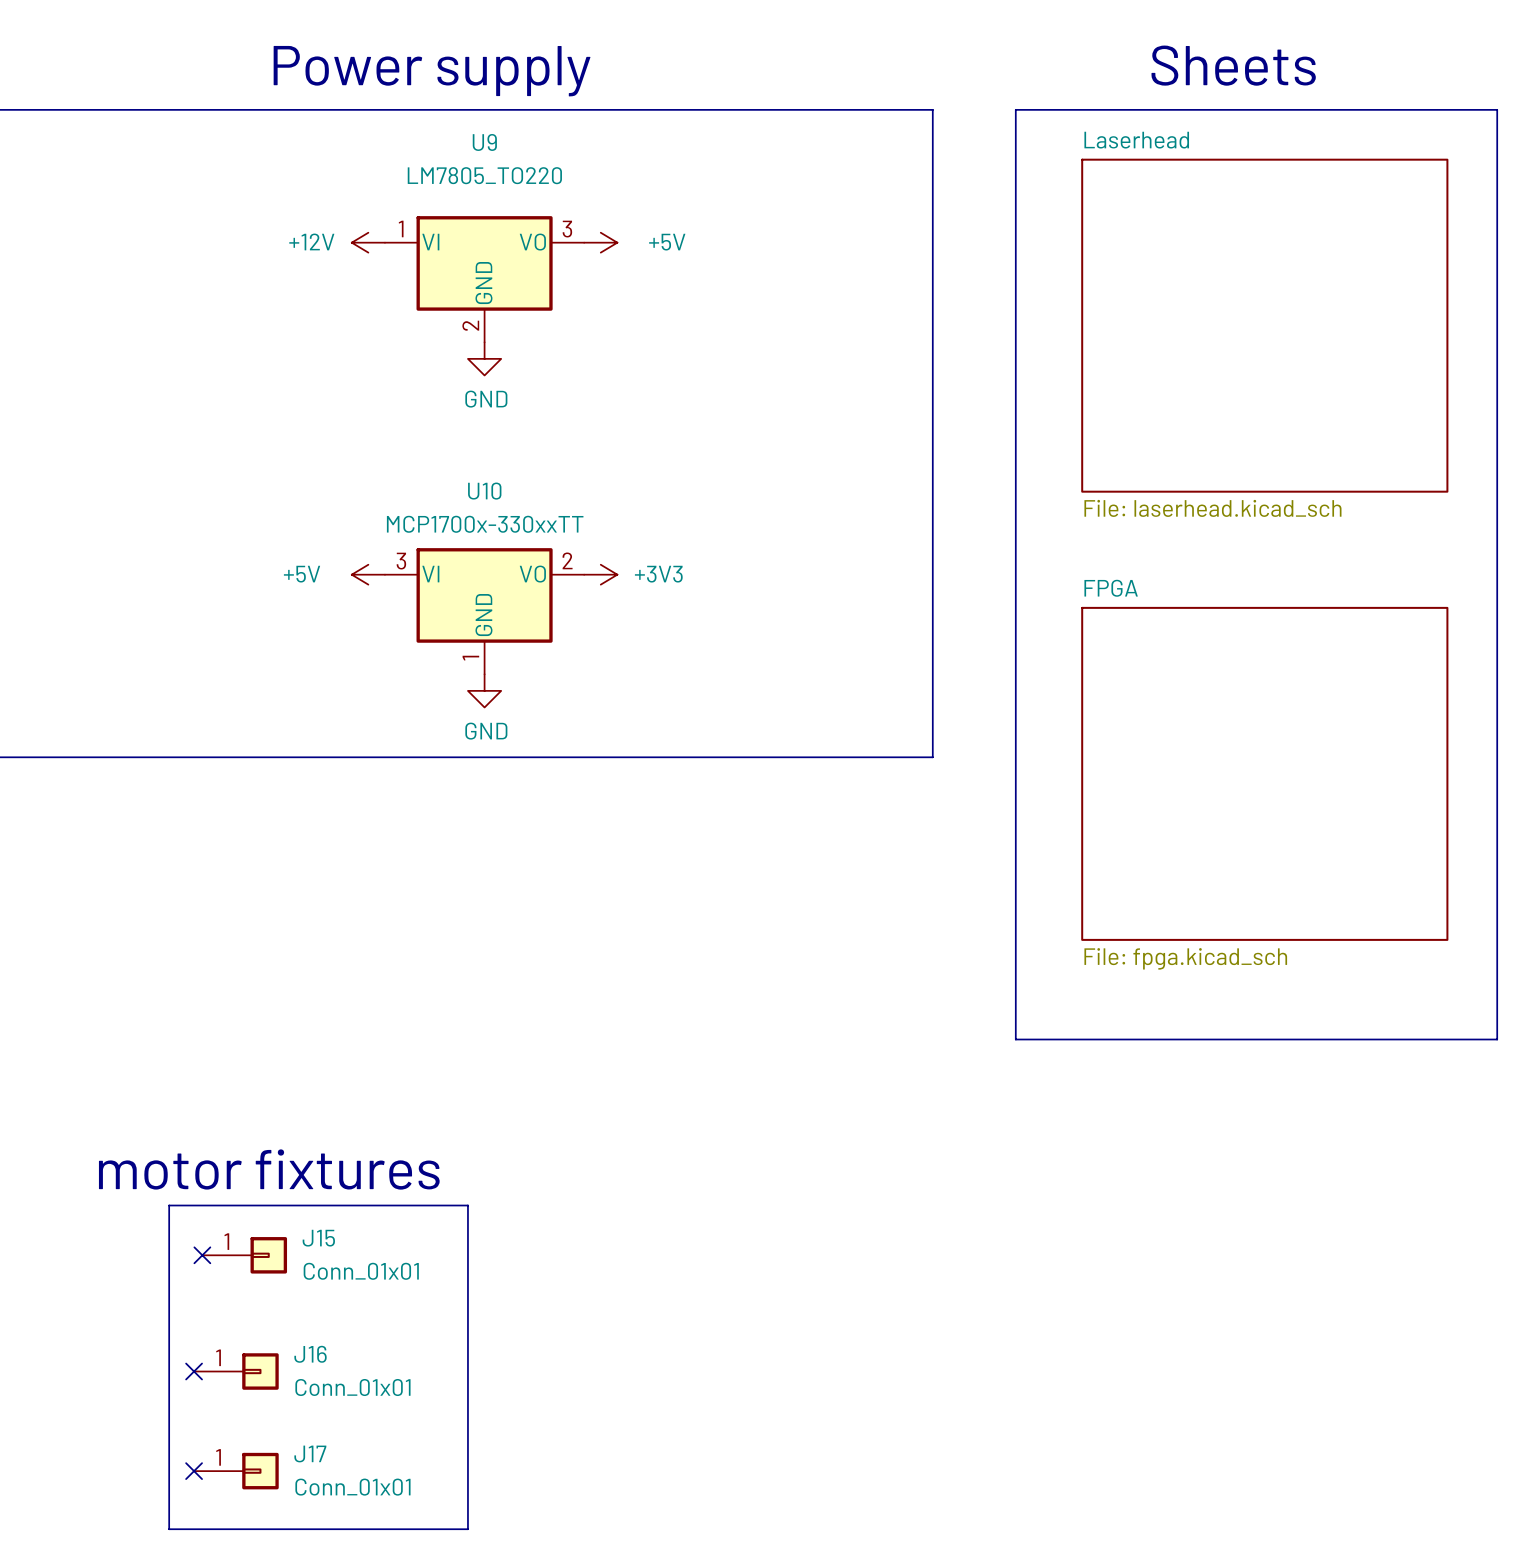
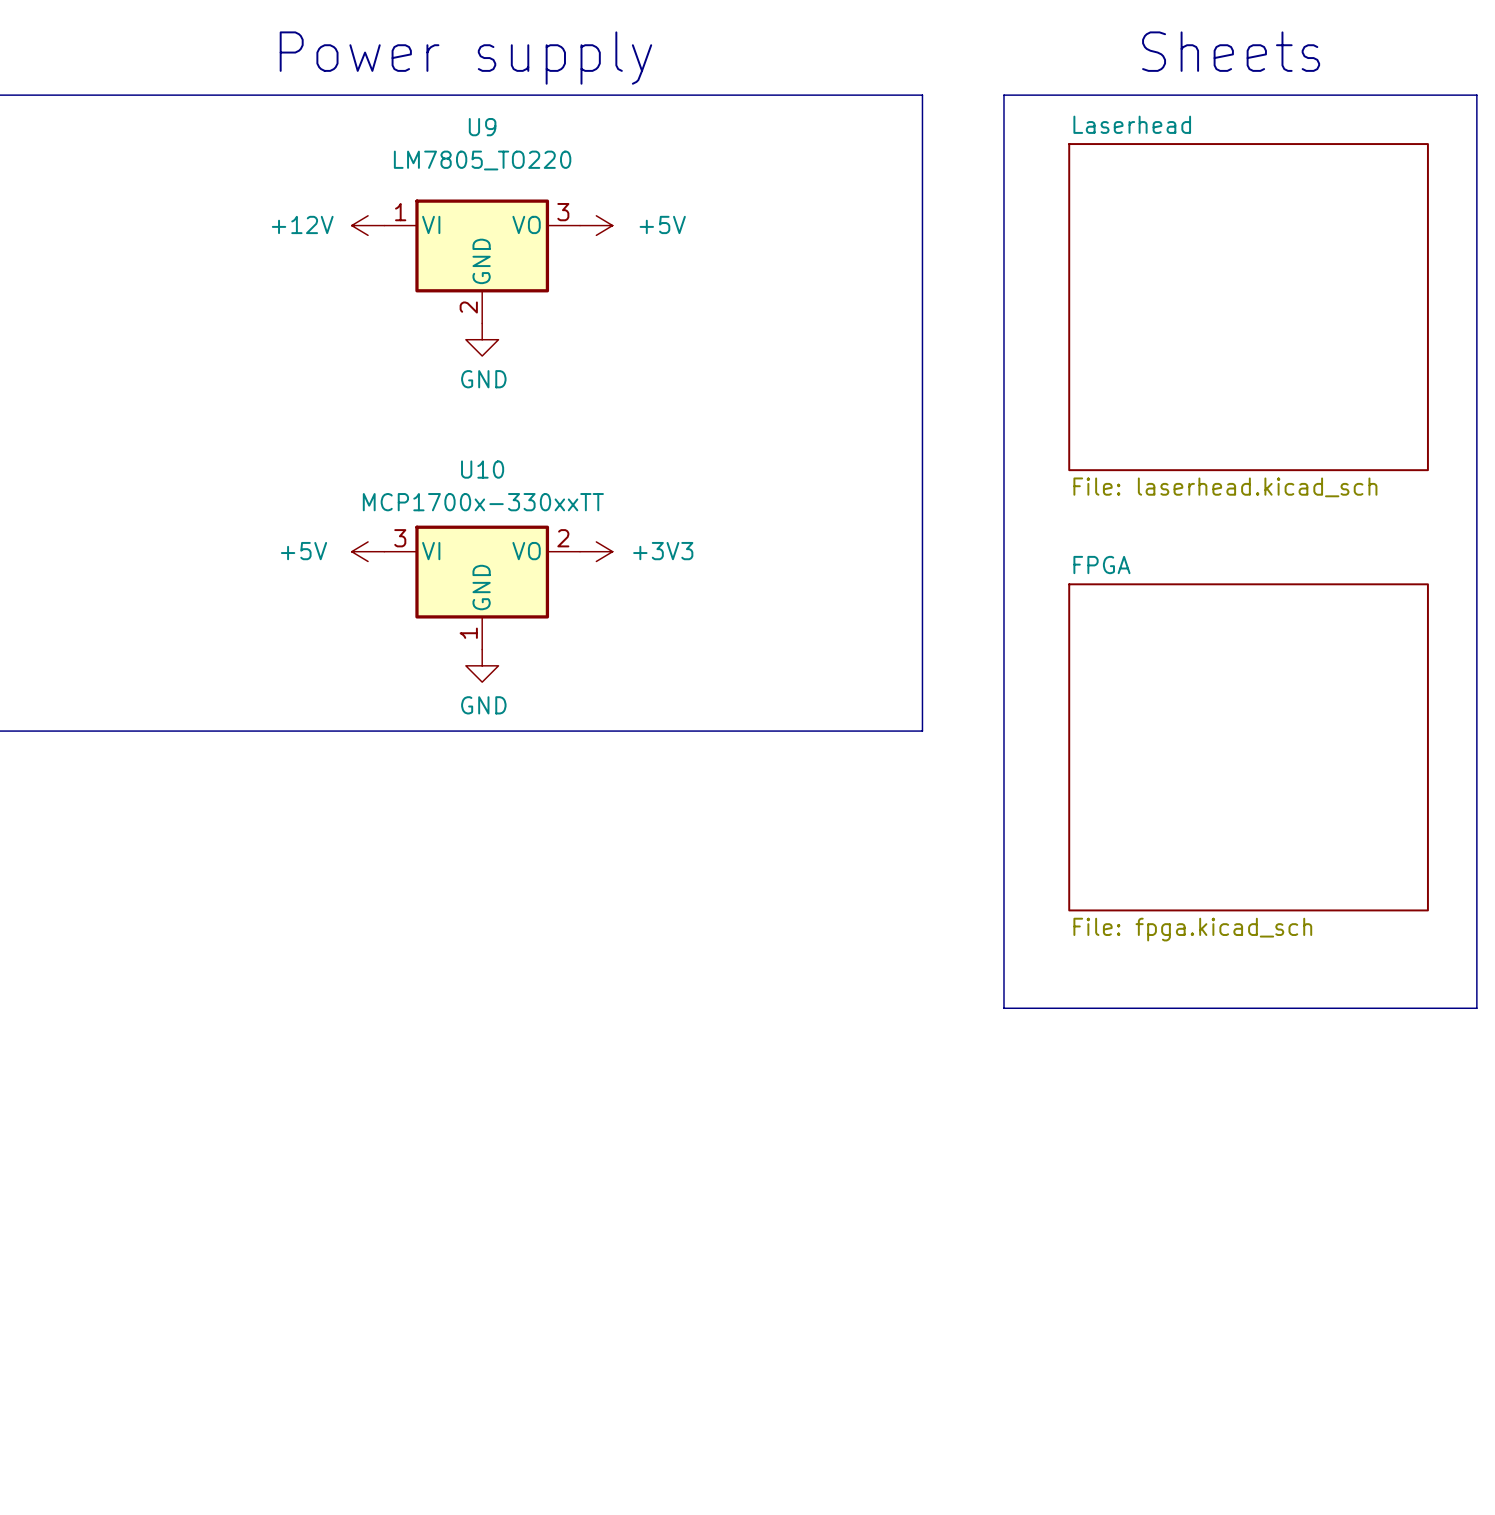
text: motor fixtures (269, 1169) -> none
line: (169, 1205) (169, 1529) (467, 1529) (467, 1205) (169, 1205) -> none
no-connect mark: (202, 1255) -> none
J15: Conn_01x01 (244, 1255) -> none
no-connect mark: (194, 1371) -> none
J16: Conn_01x01 (236, 1371) -> none
no-connect mark: (194, 1471) -> none
J17: Conn_01x01 (236, 1471) -> none

